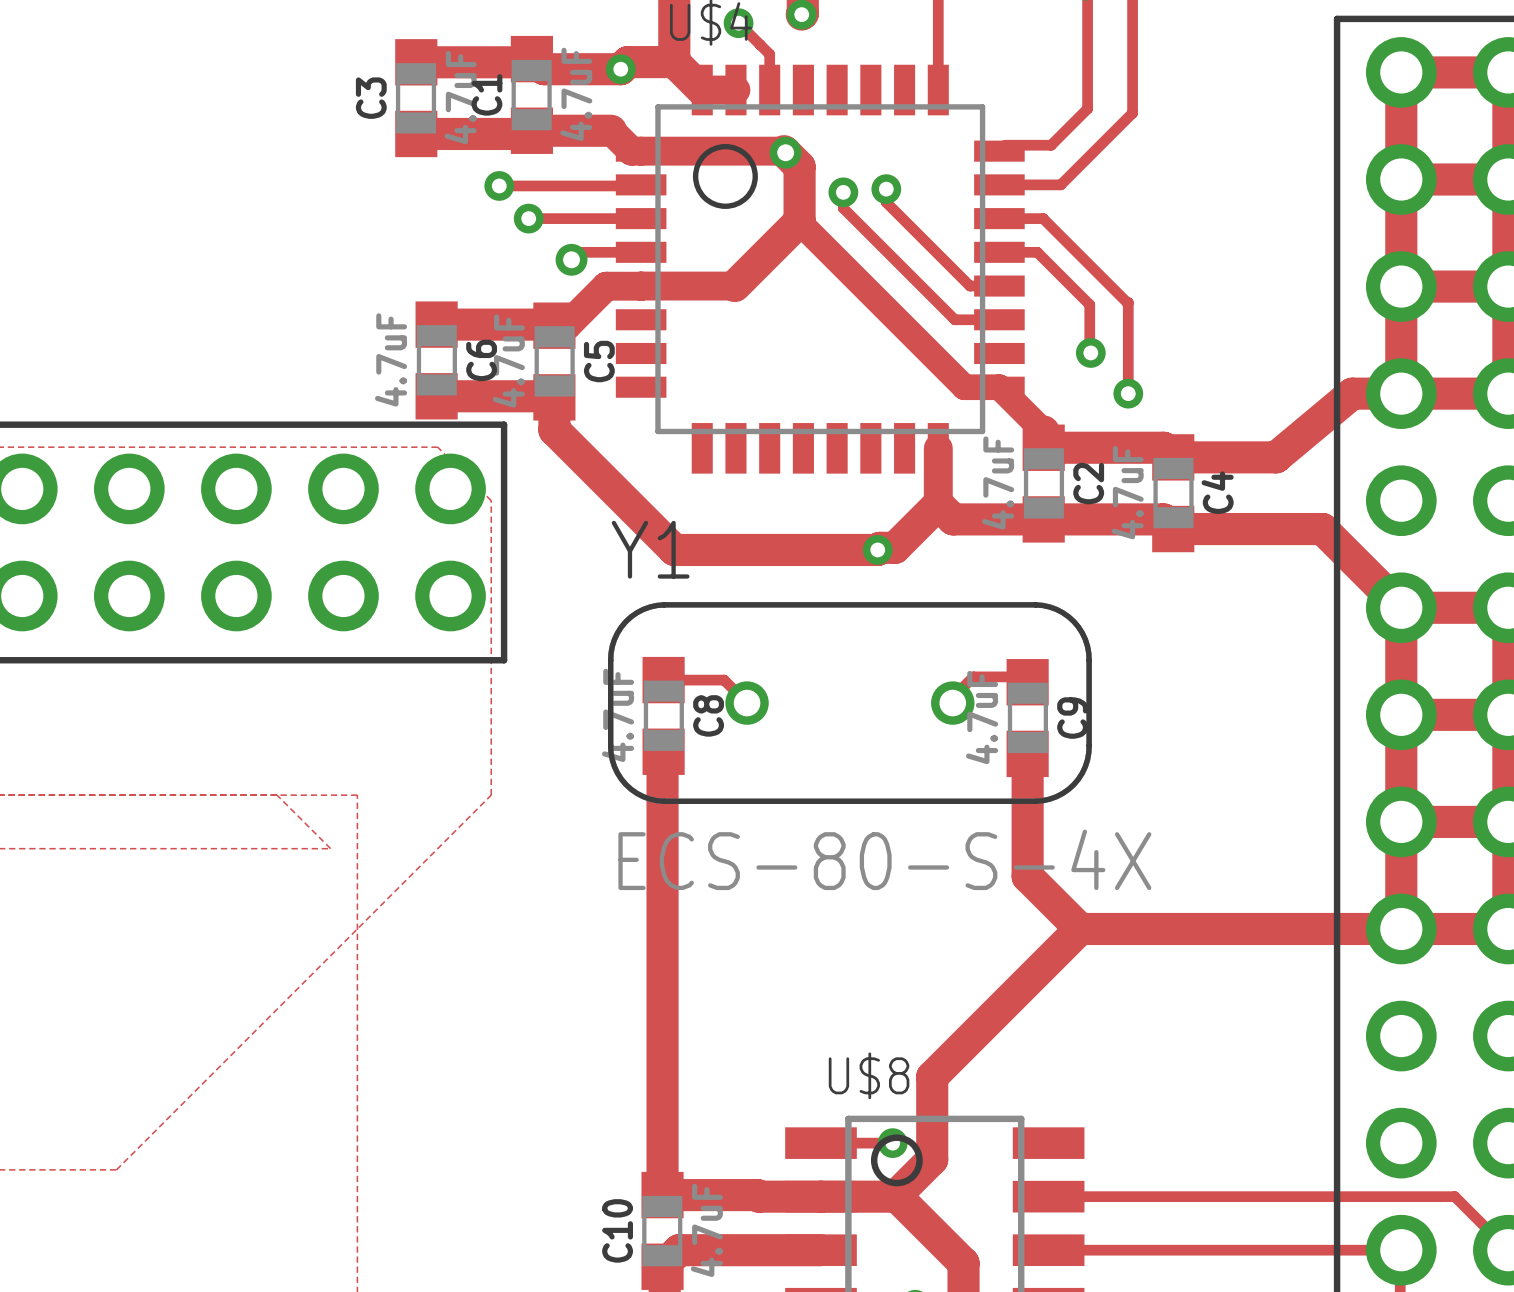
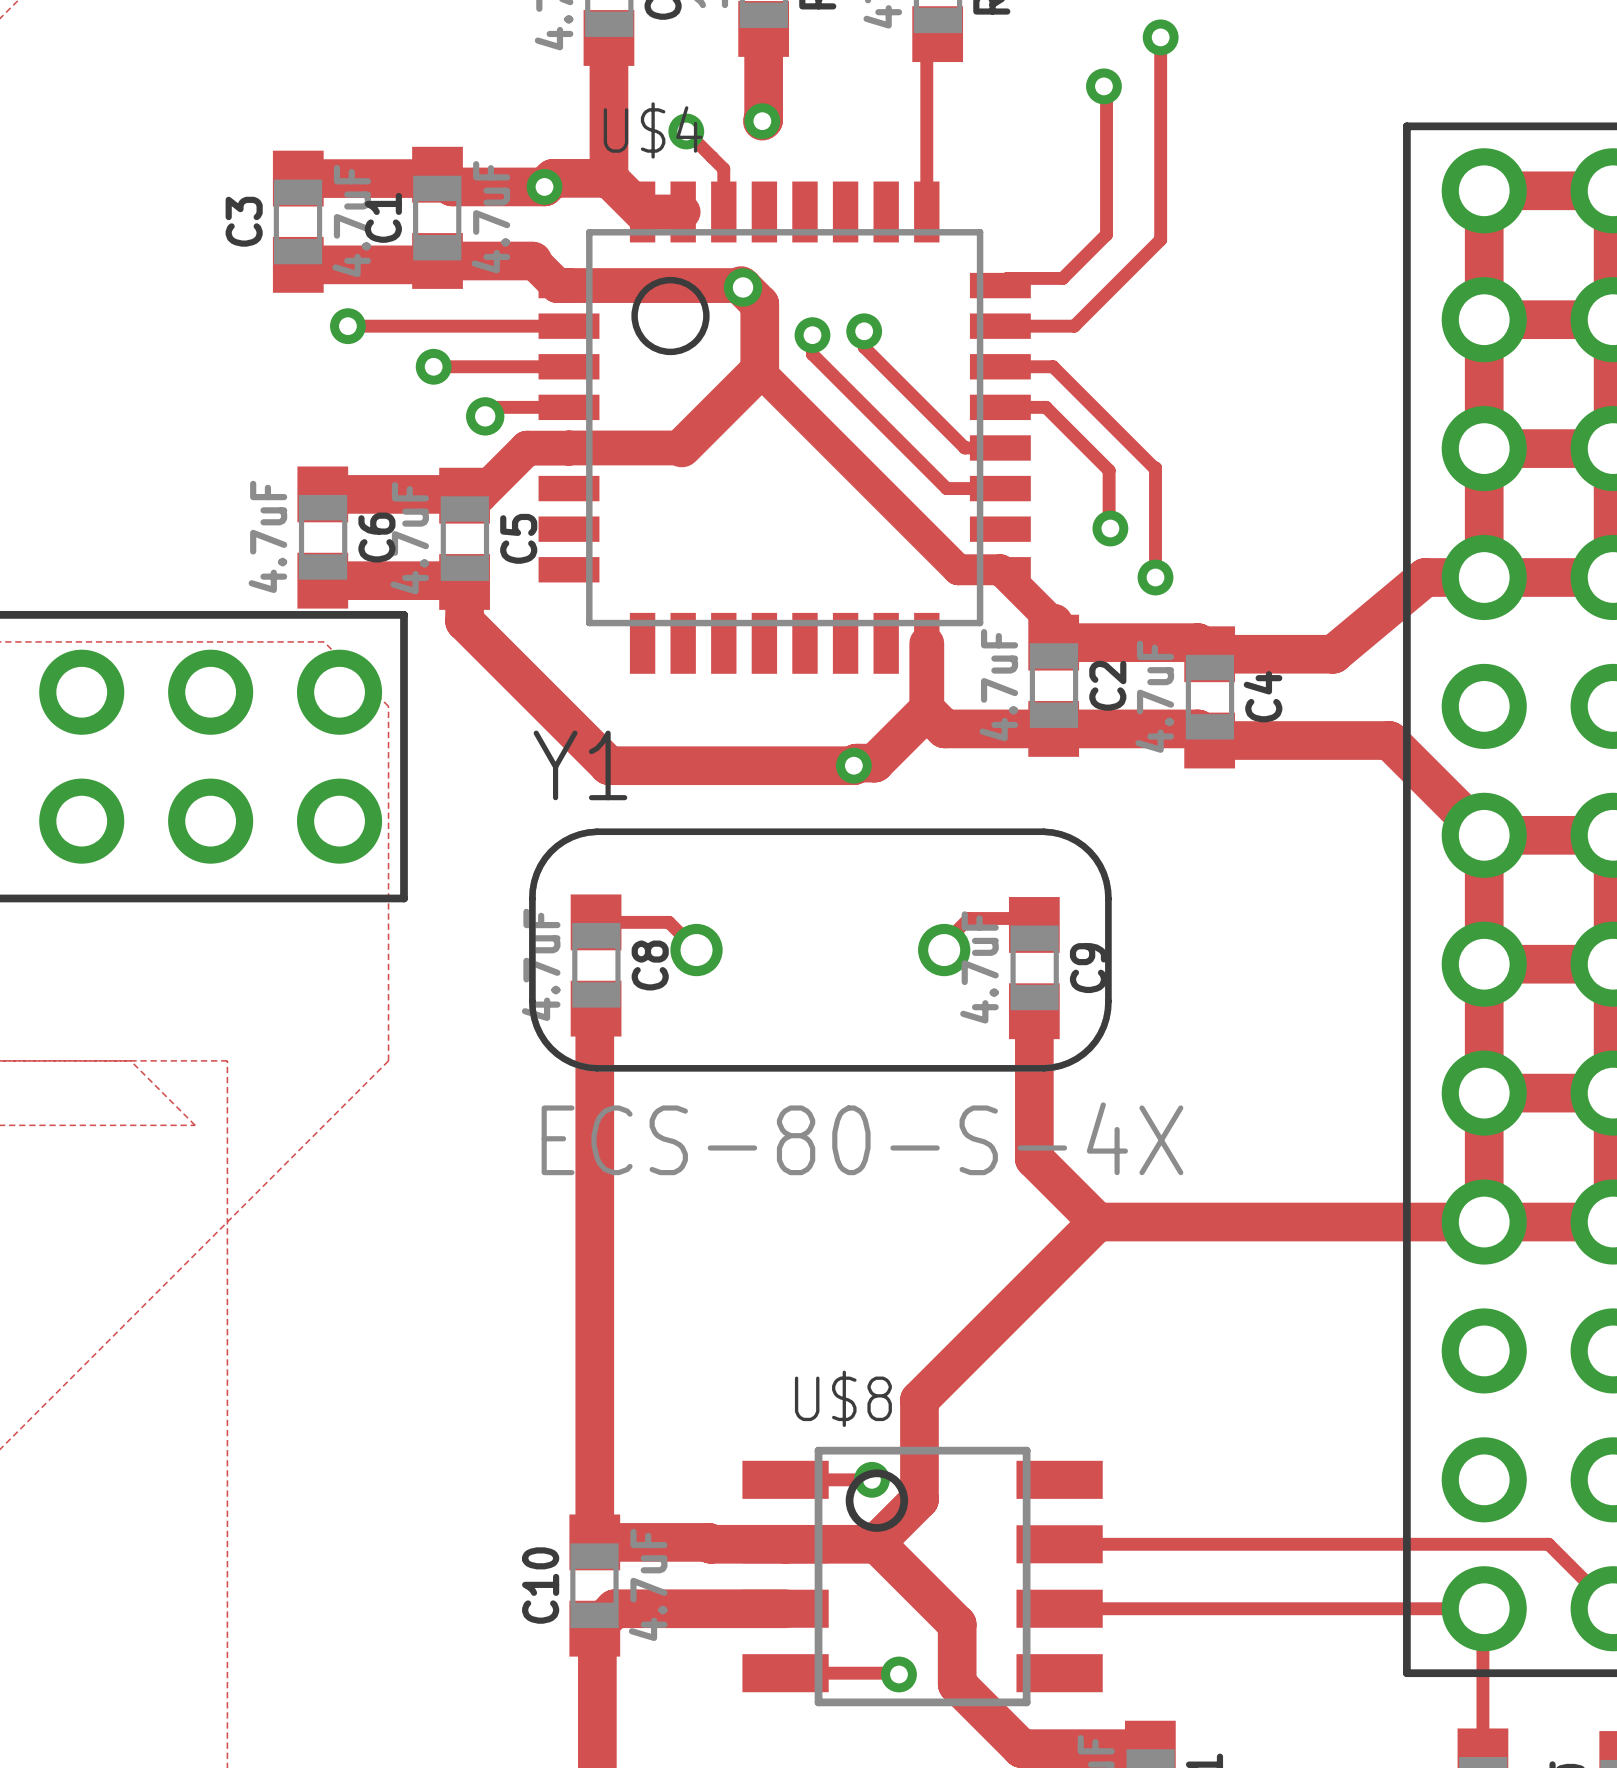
track: (641, 184) (499, 185) -> (569, 326) (347, 326)
via position: (499, 185) -> (347, 326)

